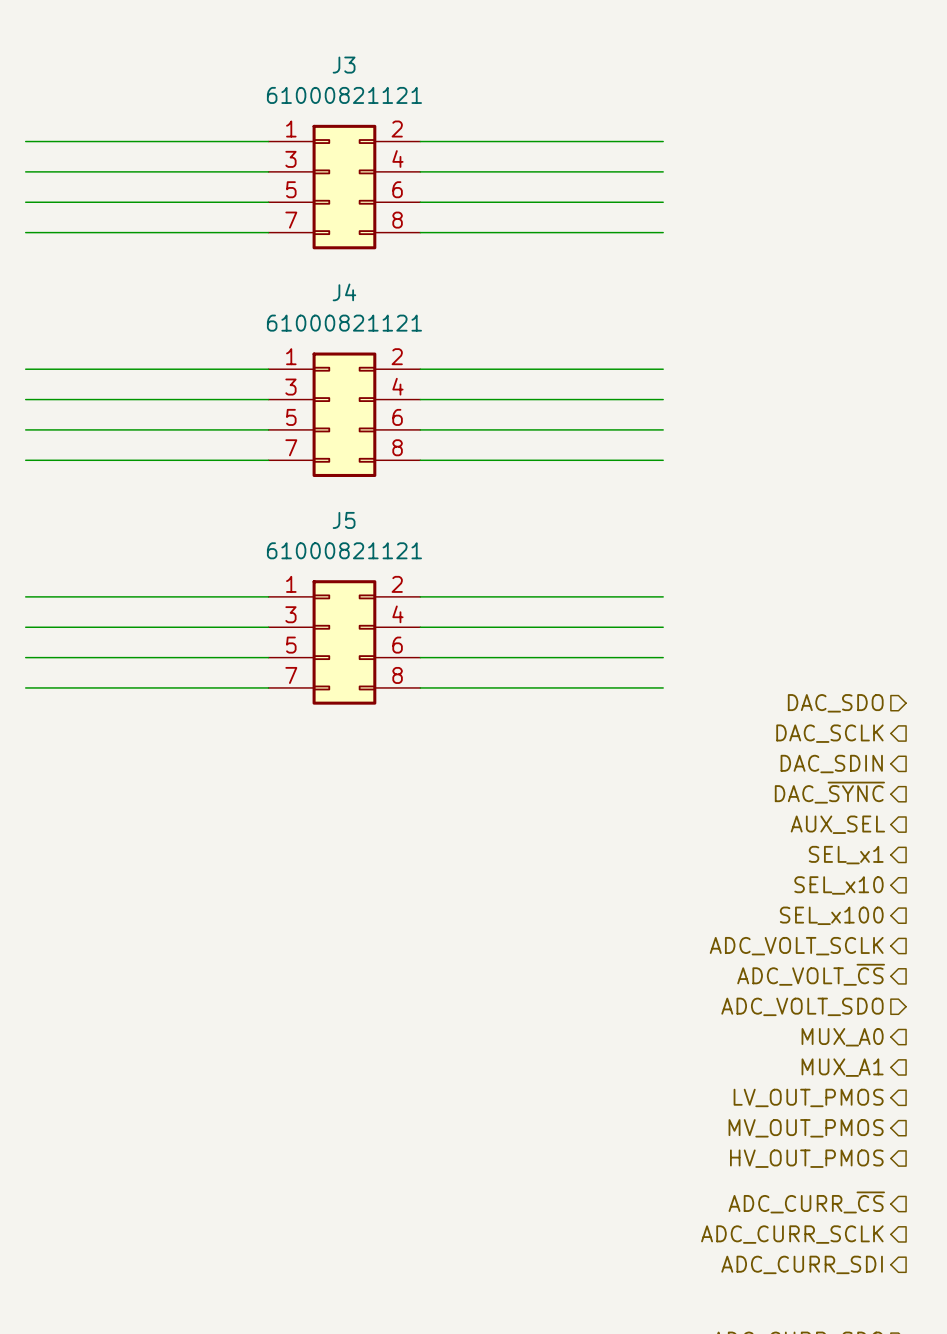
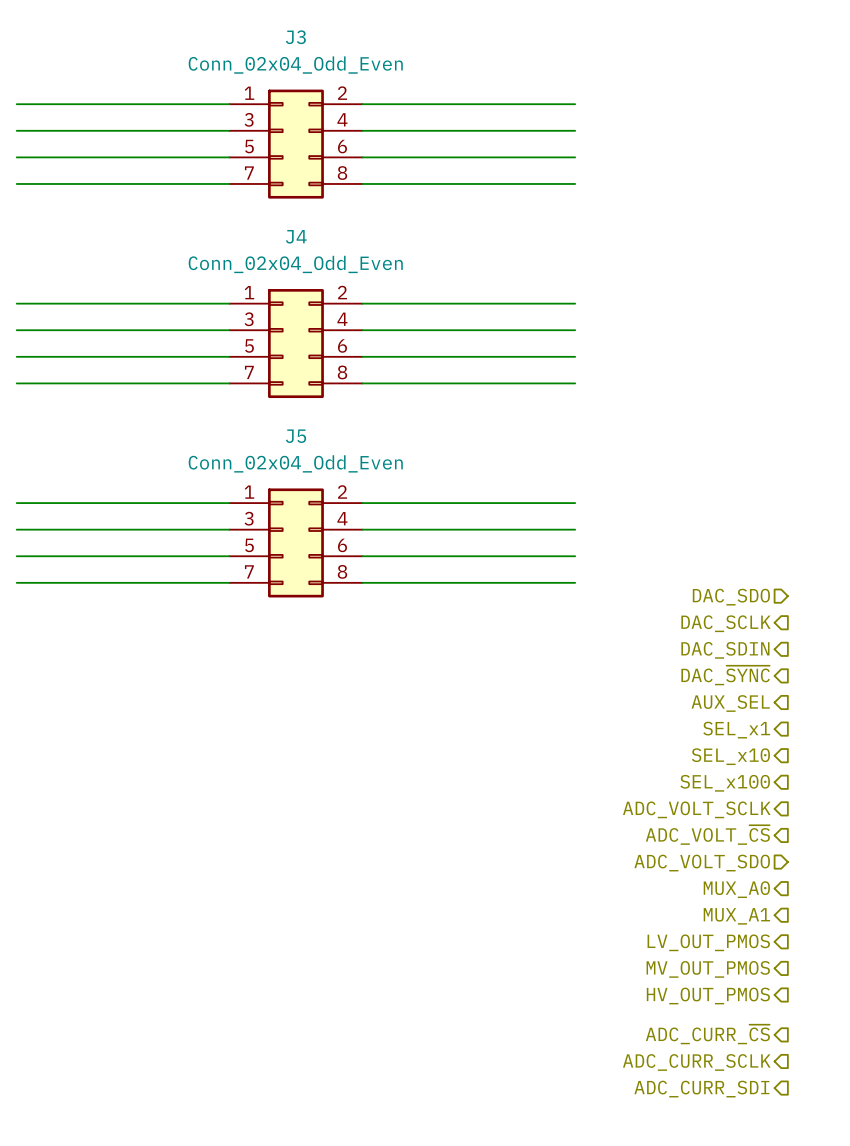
J3 value: 61000821121 (344, 95) -> Conn_02x04_Odd_Even (295, 65)
J4 value: 61000821121 (344, 323) -> Conn_02x04_Odd_Even (295, 264)
J5 value: 61000821121 (344, 550) -> Conn_02x04_Odd_Even (295, 463)

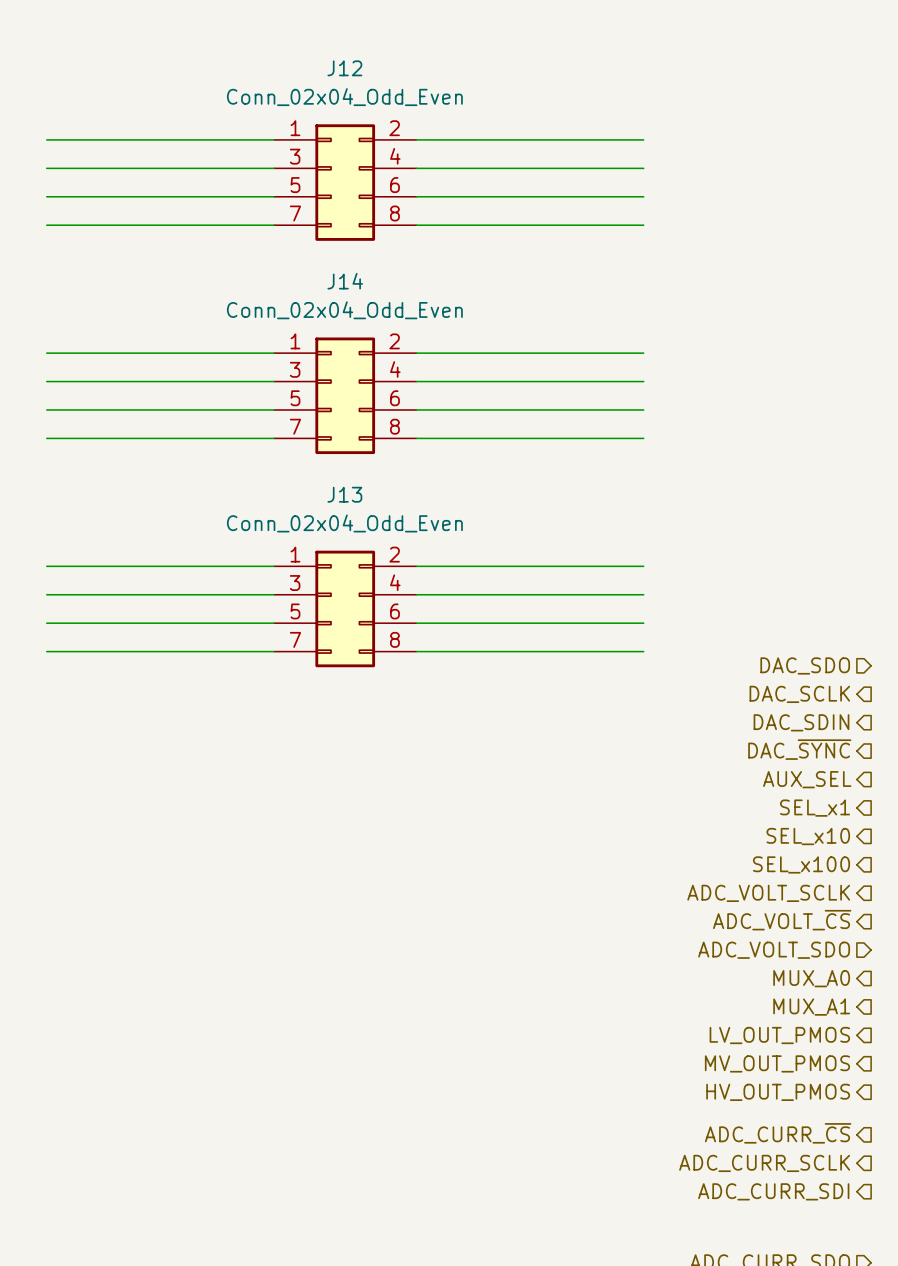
J3 name: J3 (295, 37) -> J12 (344, 68)
J4 name: J4 (296, 236) -> J14 (345, 281)
J5 name: J5 (296, 436) -> J13 (344, 494)

